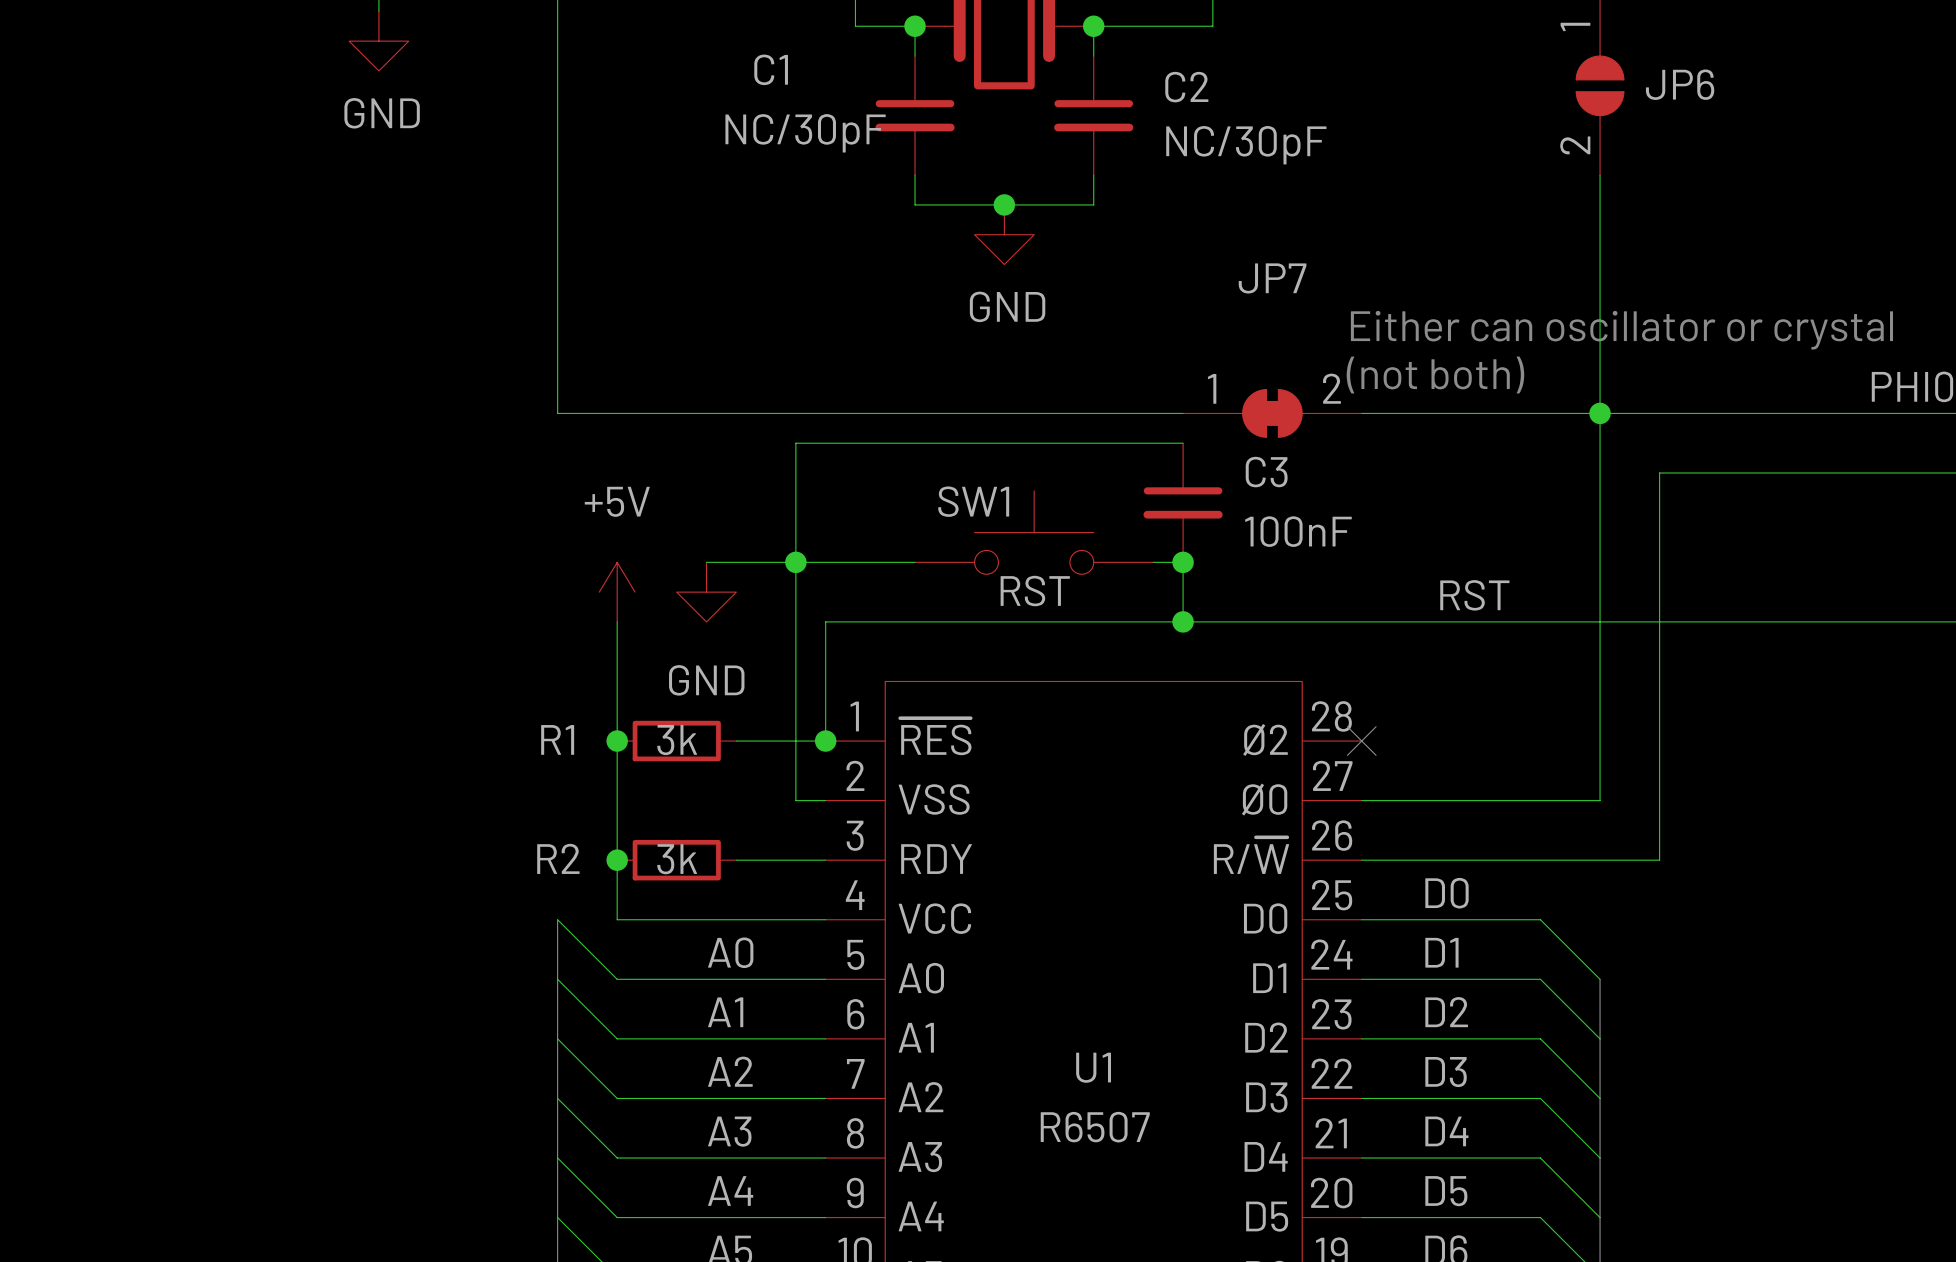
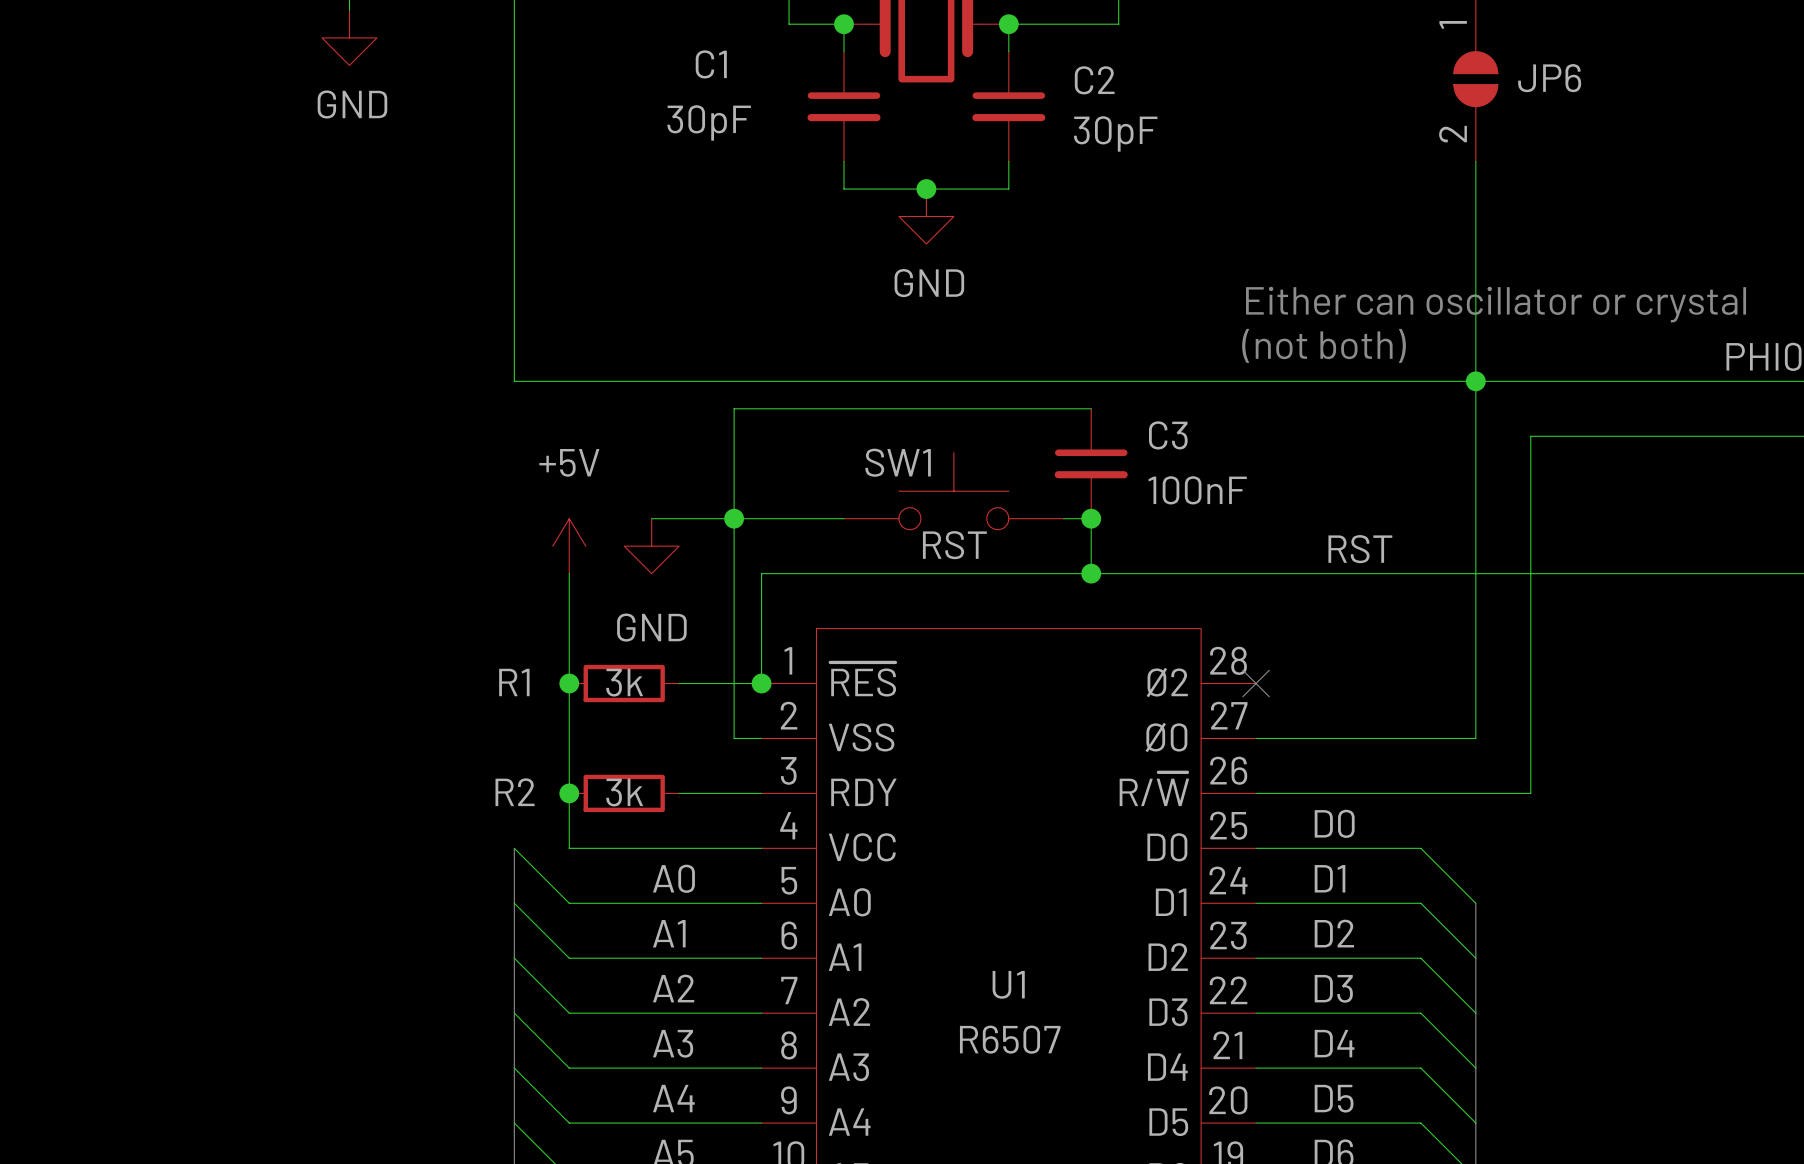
C1 value: NC/30pF (805, 133) -> 30pF (709, 122)
C2 value: NC/30pF (1246, 145) -> 30pF (1115, 133)
JP7: (1272, 413) -> none

